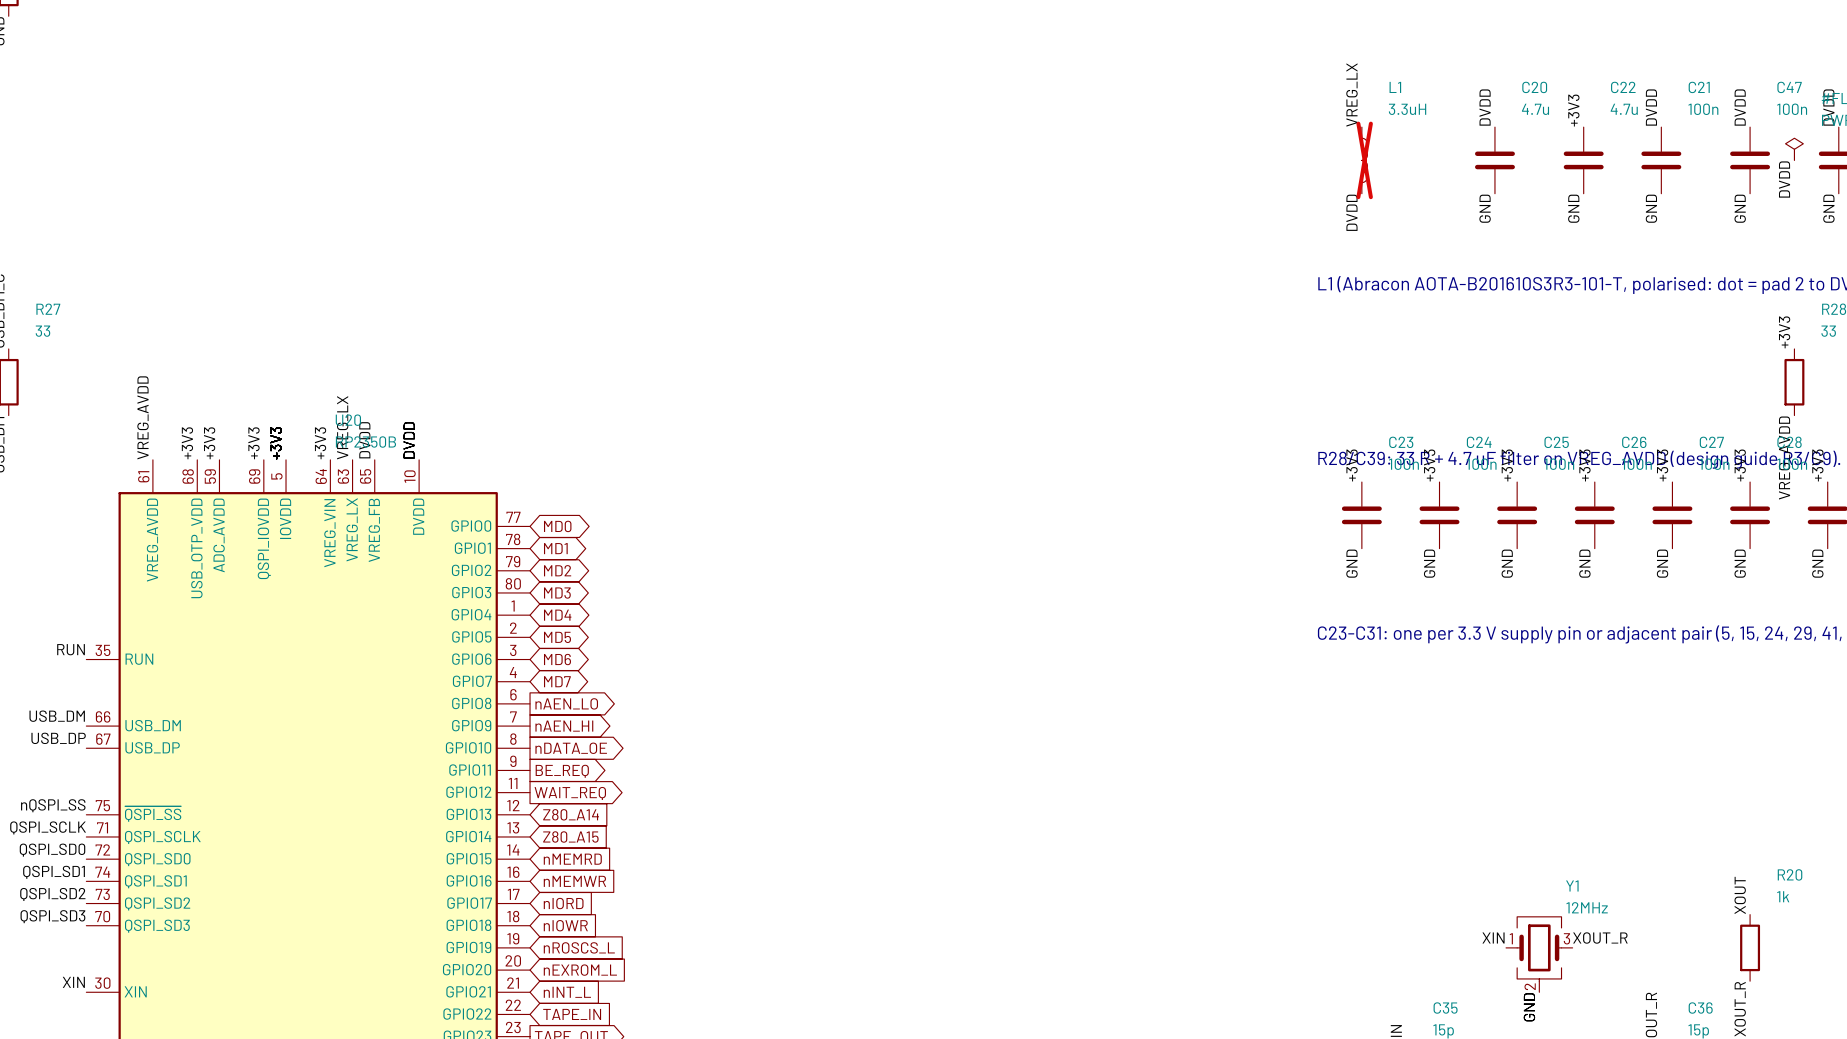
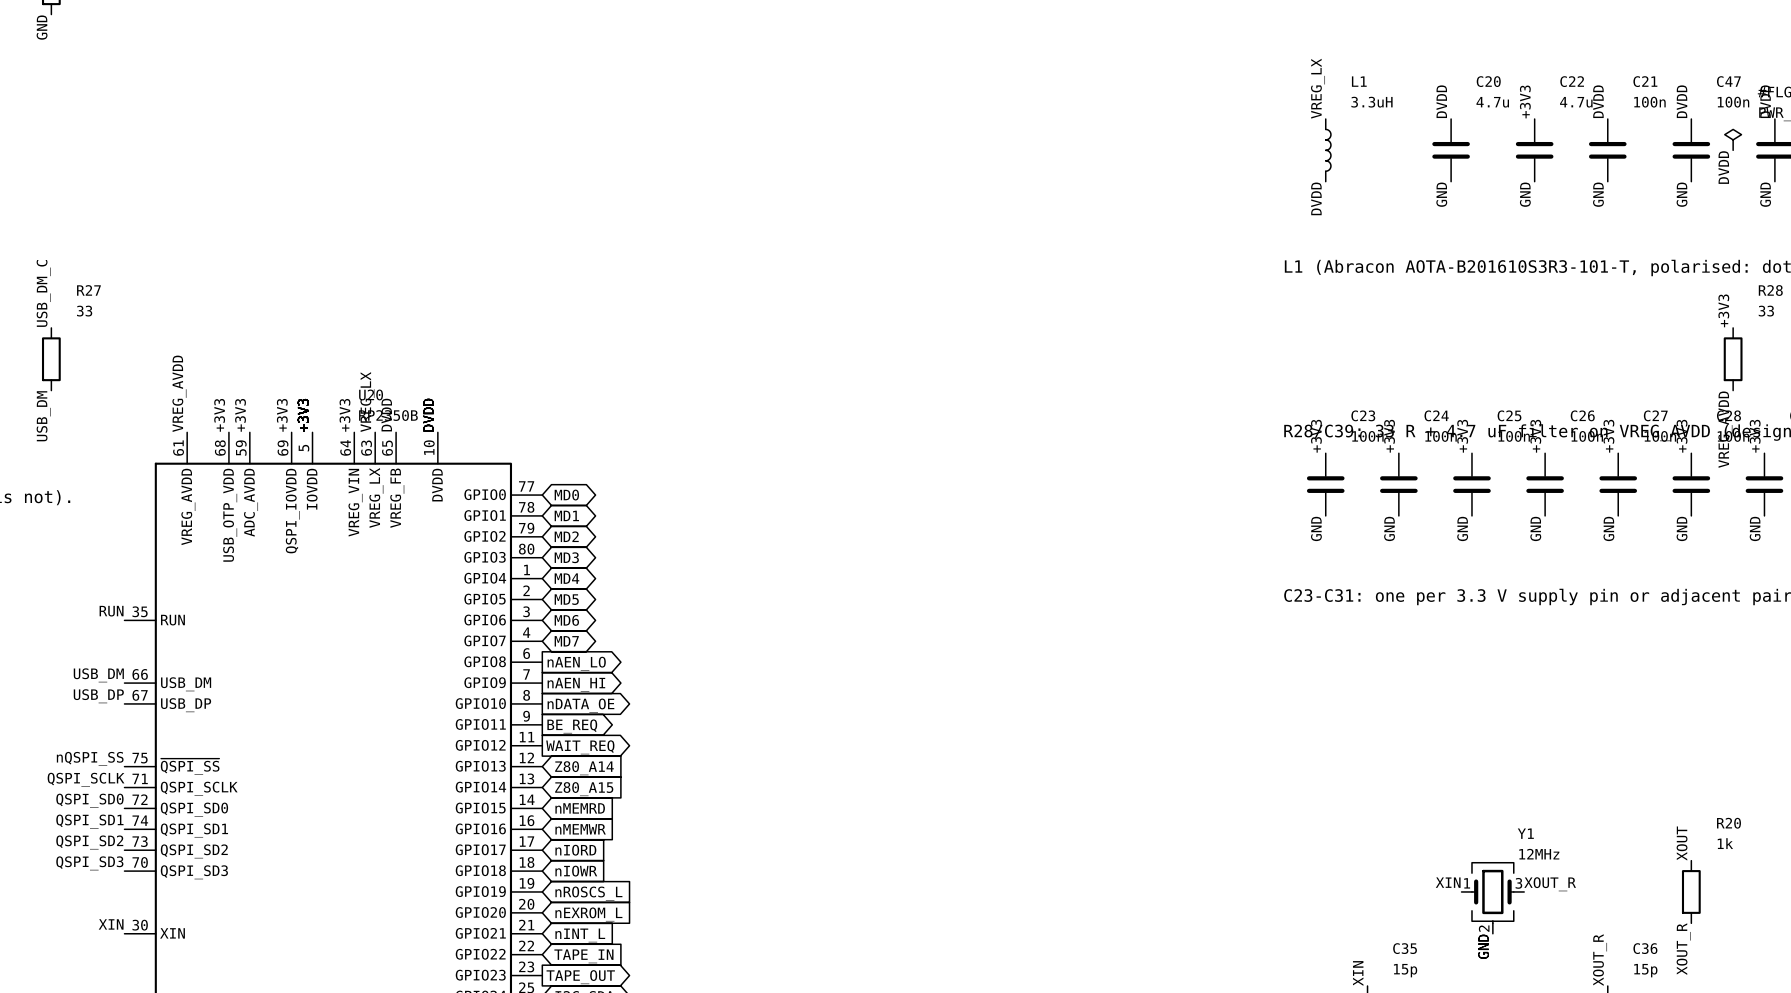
L1 do-not-place cross: (1364, 160) -> none

